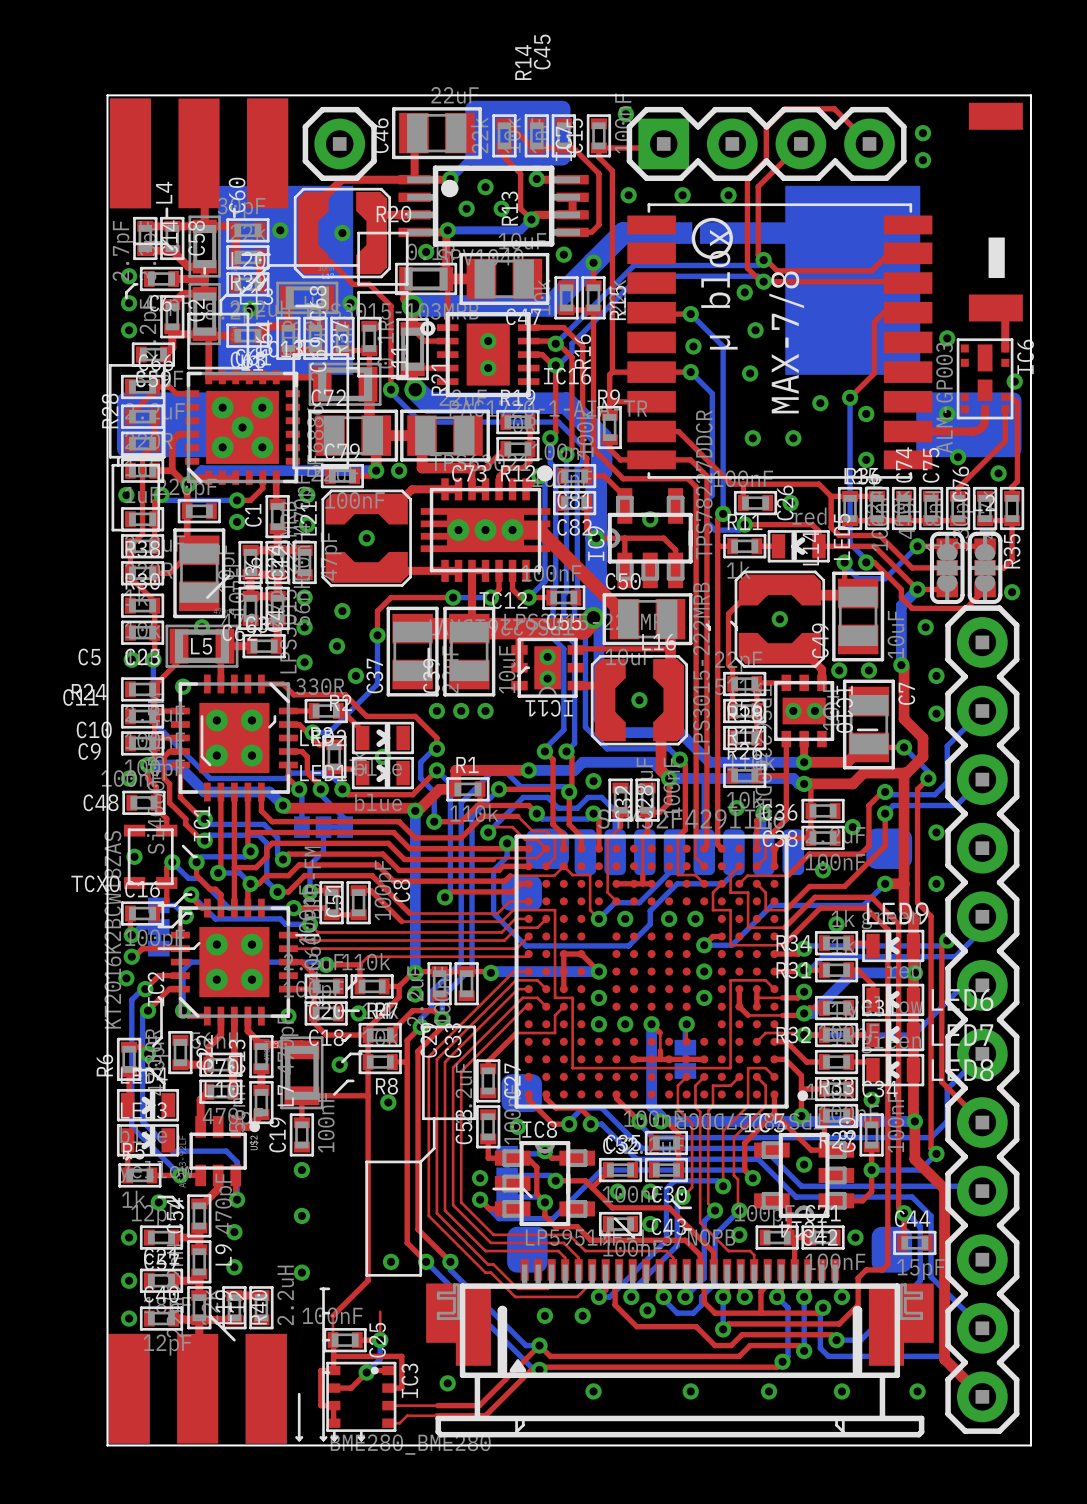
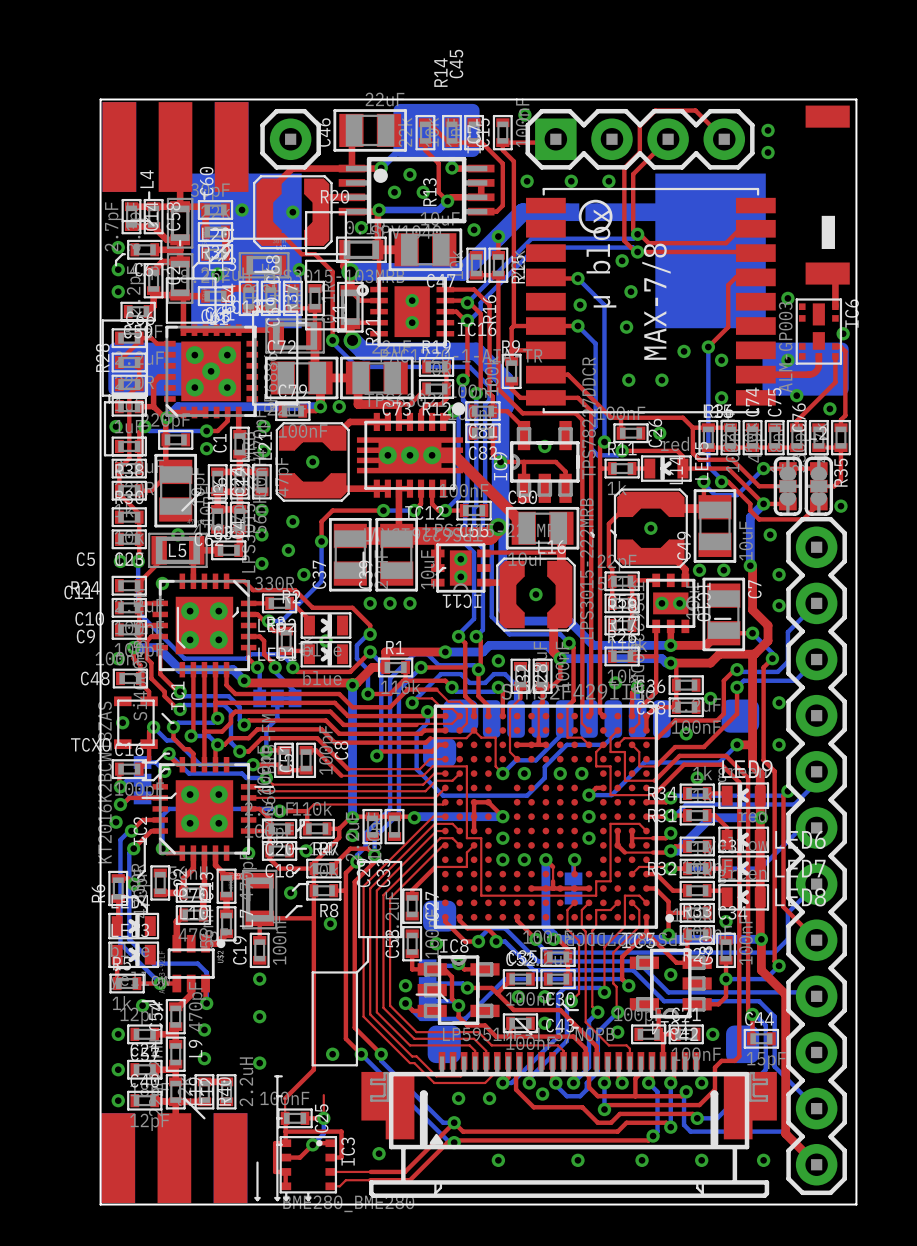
top track: (730, 1050) (730, 1068) (713, 1068) -> (610, 881) (596, 881) (596, 895)

